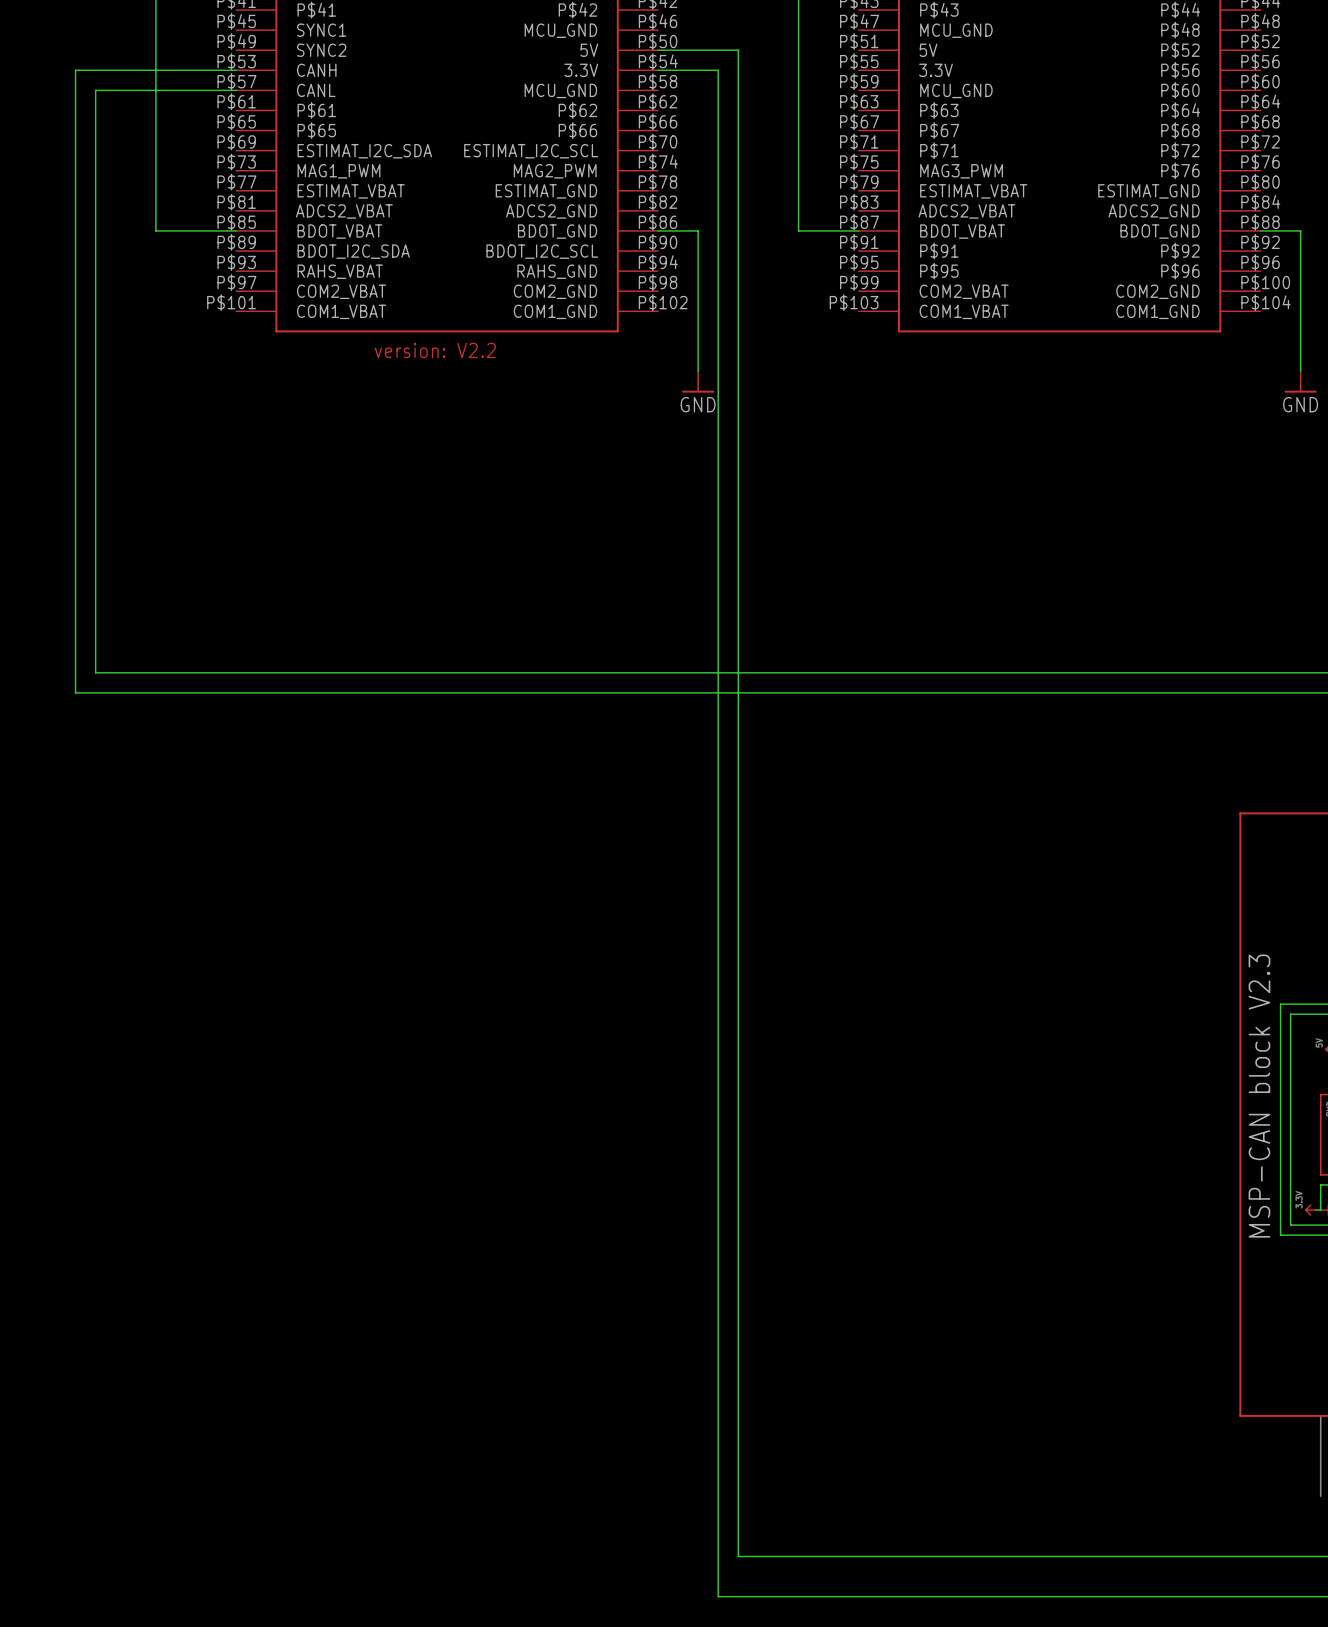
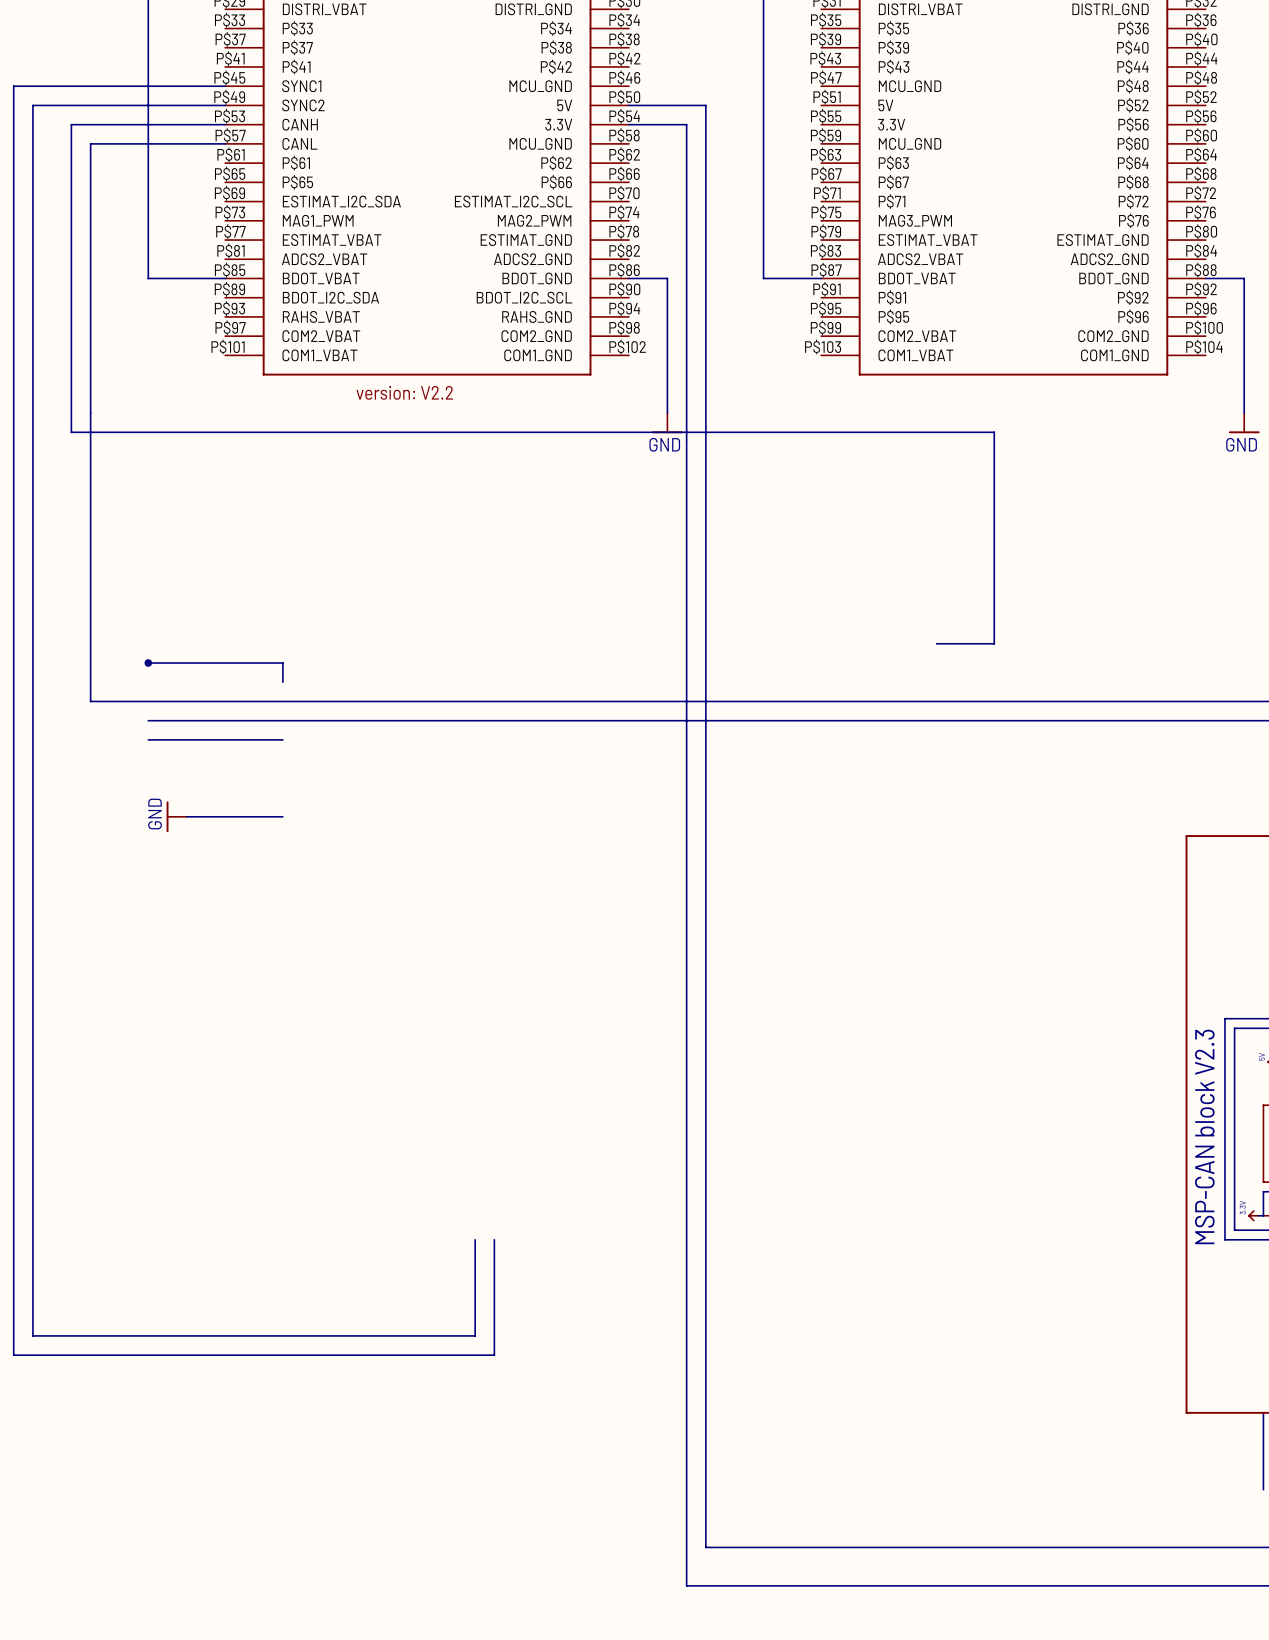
wire: none -> (225, 86) (13, 86) (13, 1355) (494, 1355) (494, 1239)
wire: none -> (225, 105) (32, 105) (32, 1335) (475, 1335) (475, 1239)
wire: (75, 391) (75, 692) (155, 692) -> (71, 432) (994, 432) (994, 643) (936, 643)
wire: none -> (148, 663) (282, 663) (282, 682)
junction: none -> (148, 663)
wire: none -> (148, 739) (282, 739)
power symbol: none -> GND (176, 816)
wire: none -> (186, 816) (282, 816)

